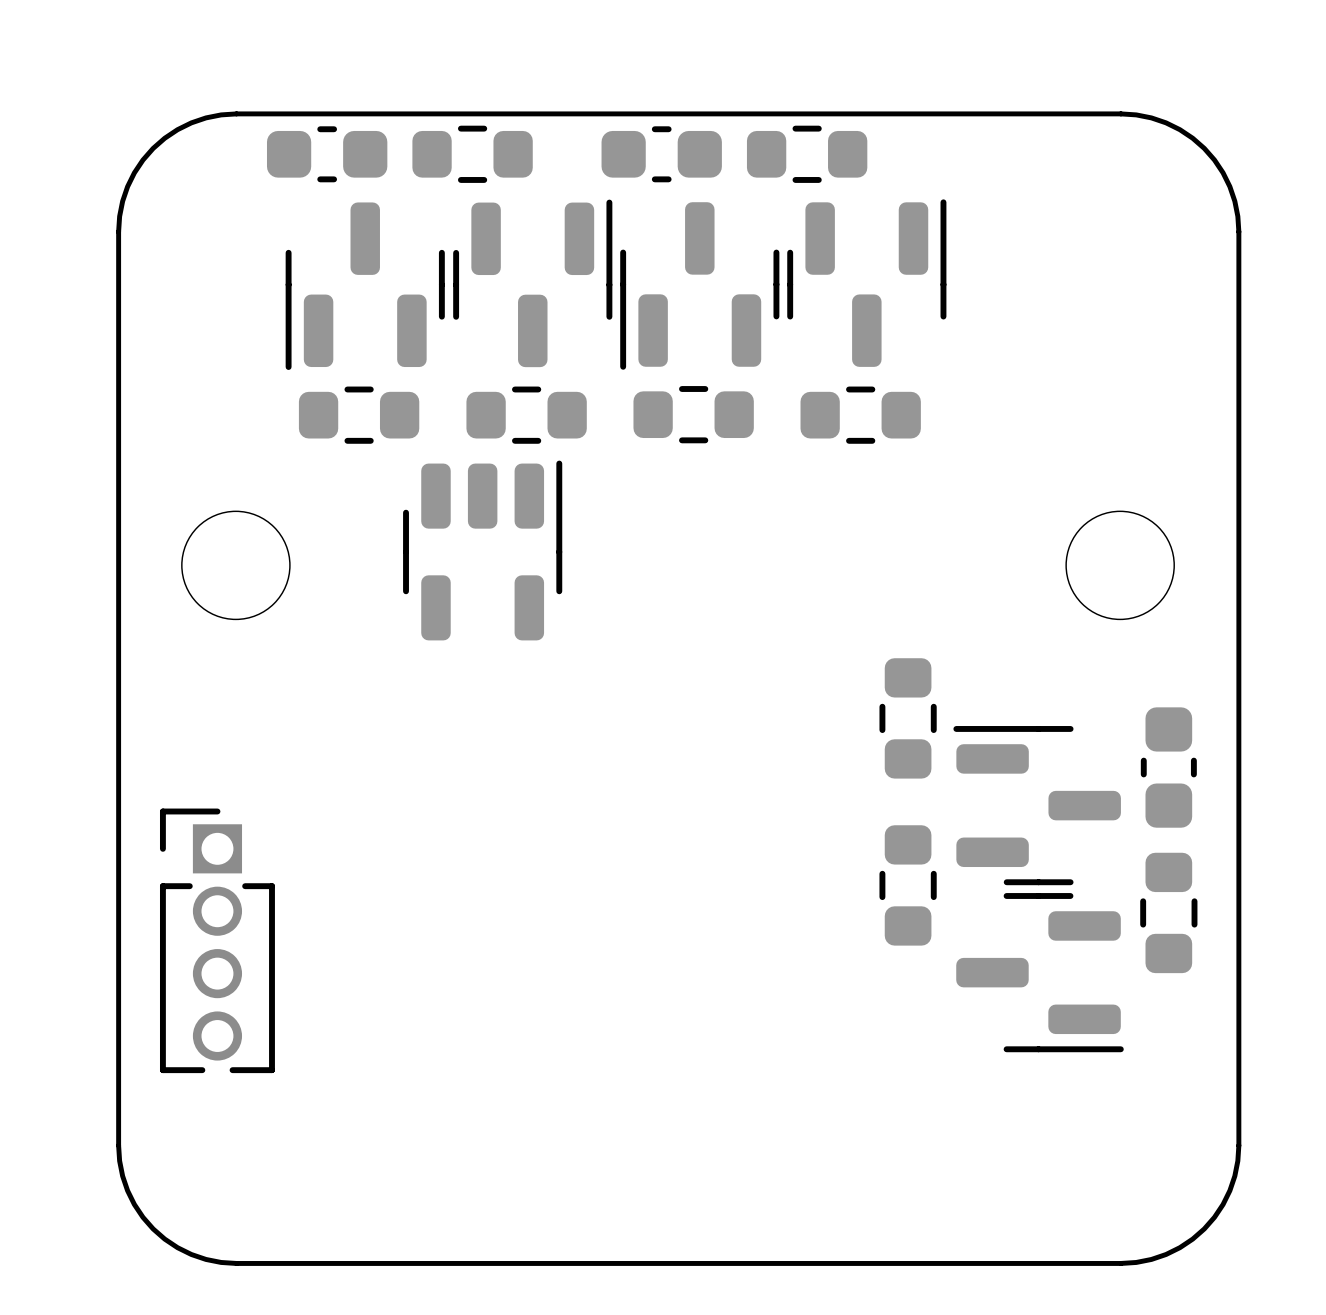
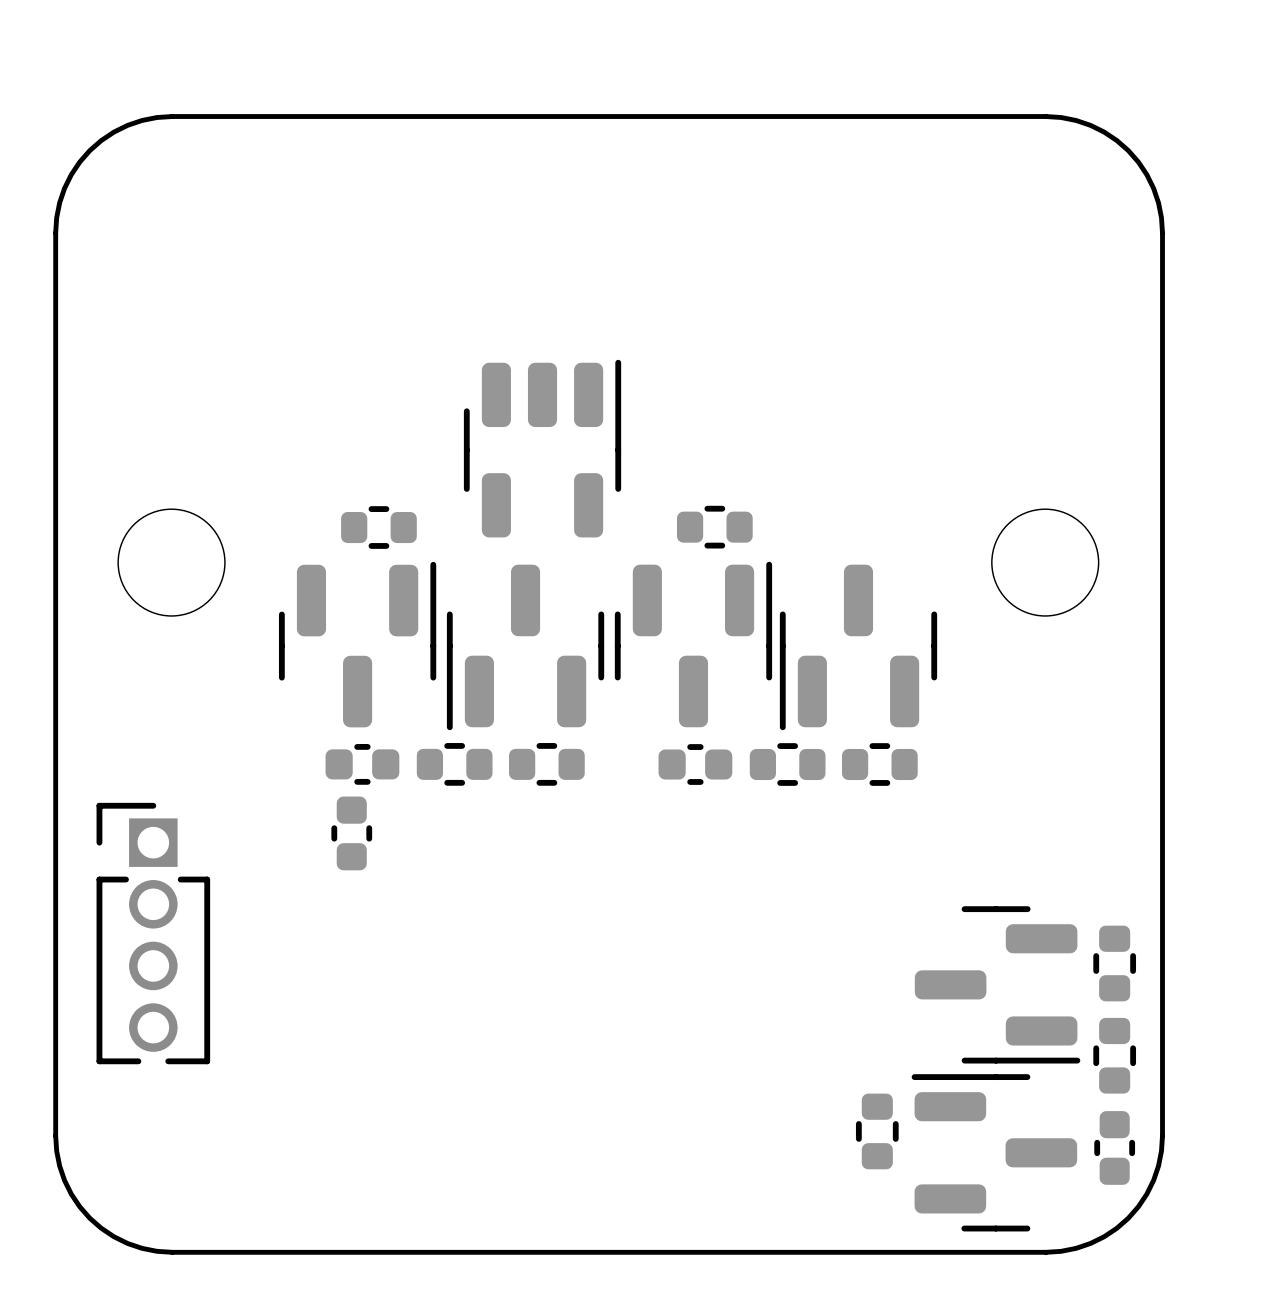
part: (327, 154) -> none
part: (472, 154) -> none
part: (661, 154) -> none
part: (807, 154) -> none
part: (532, 283) -> none
part: (866, 283) -> none
part: (699, 285) -> none
part: (365, 286) -> none
part: (693, 414) -> none
part: (359, 415) -> none
part: (526, 415) -> none
part: (860, 415) -> none
part: none -> (542, 448)
part footprint: [403, 460, 563, 641] -> [341, 506, 417, 549]
part: none -> (714, 527)
part: none -> (357, 644)
part: none -> (693, 644)
part: none -> (525, 647)
part: none -> (858, 647)
part: (908, 718) -> none
part: (1168, 767) -> none
part: none -> (362, 764)
part: none -> (454, 764)
part: none -> (546, 764)
part: none -> (695, 764)
part: none -> (787, 764)
part: none -> (879, 764)
part: (1037, 805) -> none
part: none -> (351, 833)
part: (908, 885) -> none
part: (1168, 912) -> none
part: none -> (1114, 963)
part position: (1040, 972) -> (997, 984)
part: none -> (1114, 1055)
part: none -> (877, 1131)
part: none -> (1114, 1147)
part: none -> (994, 1152)

